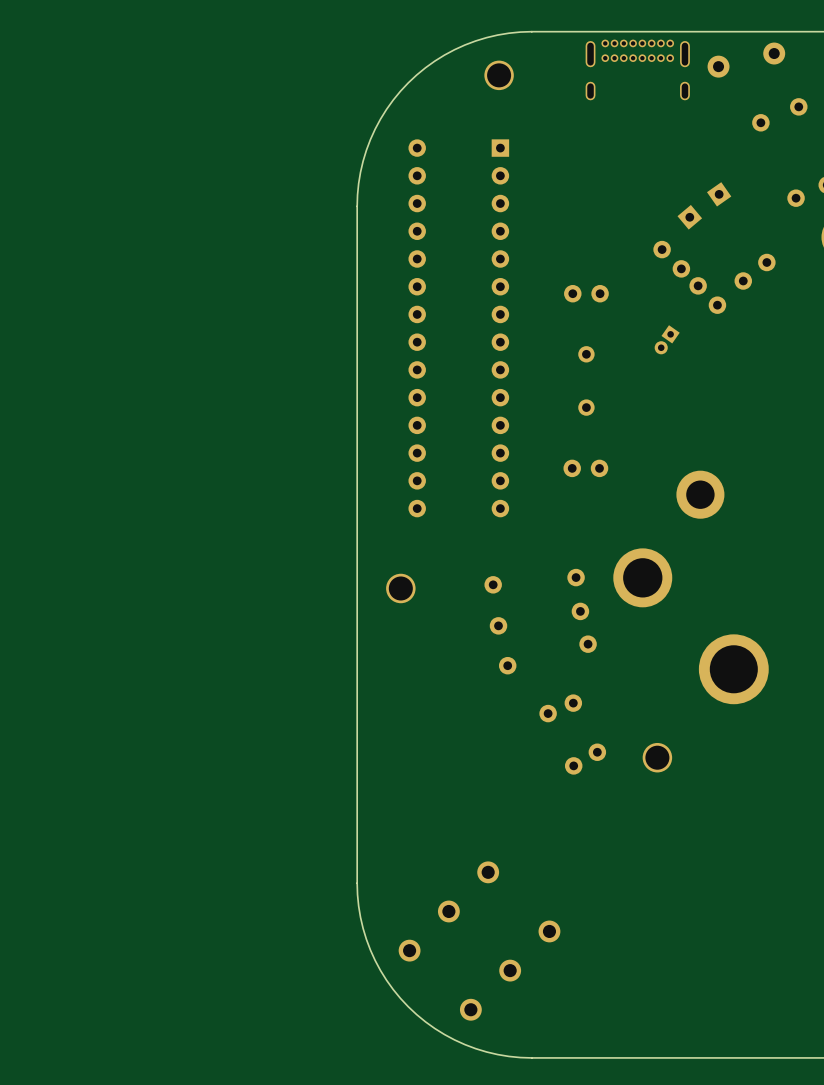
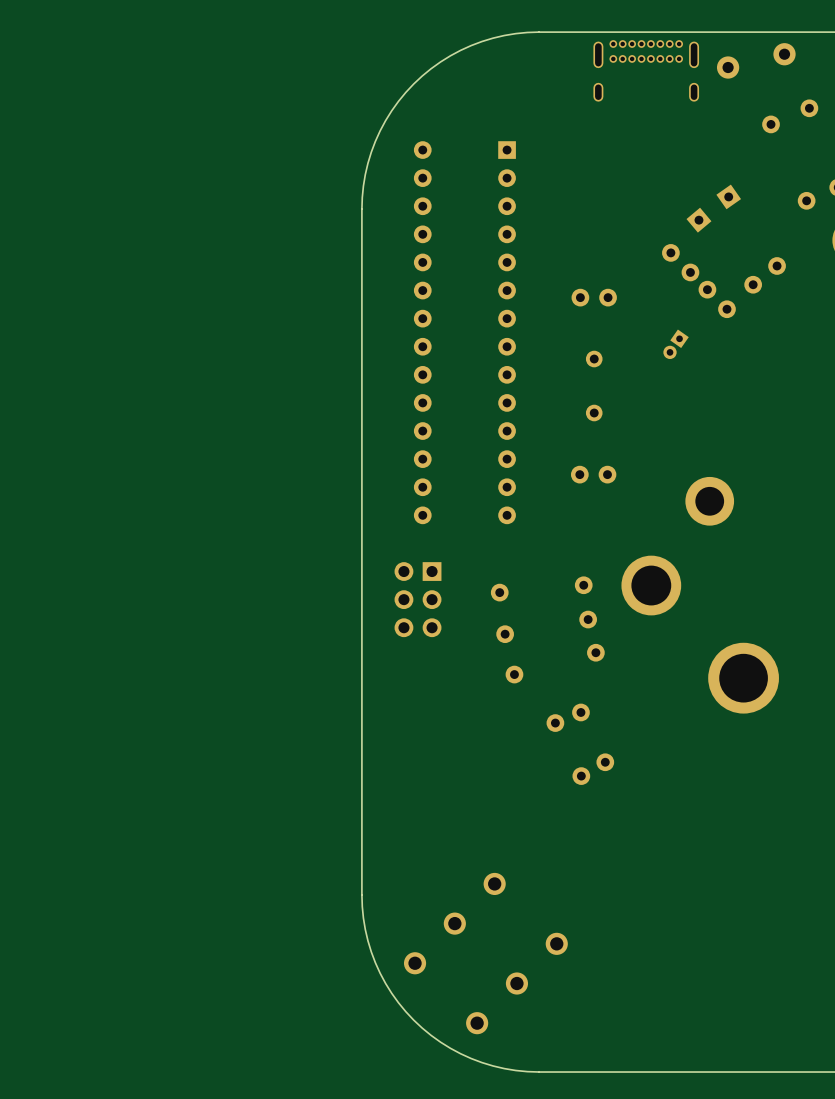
part: (499, 75) -> none
part: (400, 588) -> none
part: none -> (418, 599)
part: (657, 757) -> none

